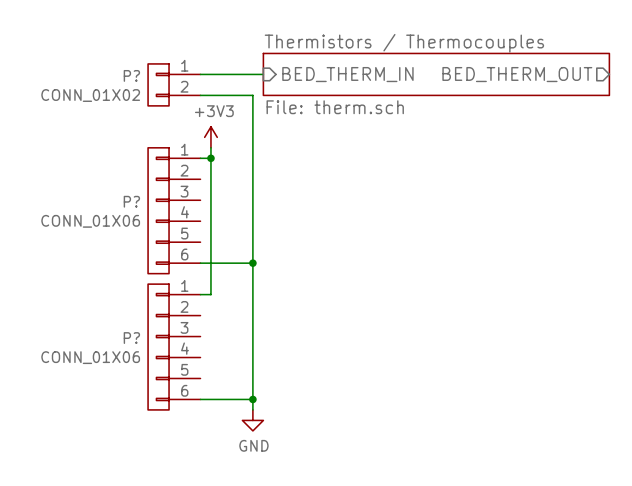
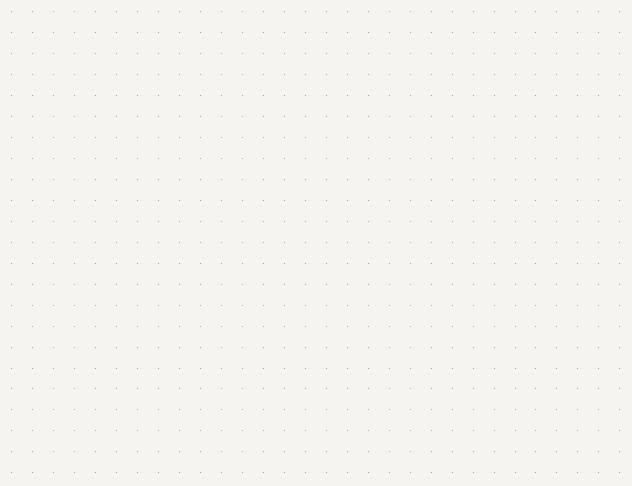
wire: (200, 74) (263, 74) -> none
sheet pin: BED_THERM_IN (347, 74) -> none
sheet Thermistors / Thermocouples: File: therm.sch (436, 74) -> none
sheet pin: BED_THERM_OUT (517, 74) -> none
P?: CONN_01X02 (174, 84) -> none
wire: (200, 95) (252, 95) (252, 409) -> none
power symbol: +3V3 (210, 137) -> none
wire: (210, 147) (210, 294) (200, 294) -> none
wire: (200, 158) (210, 158) -> none
junction: (210, 158) -> none
P?: CONN_01X06 (174, 210) -> none
wire: (200, 263) (252, 263) -> none
junction: (252, 263) -> none
P?: CONN_01X06 (174, 347) -> none
wire: (200, 399) (252, 399) -> none
junction: (252, 399) -> none
power symbol: GND (252, 420) -> none

